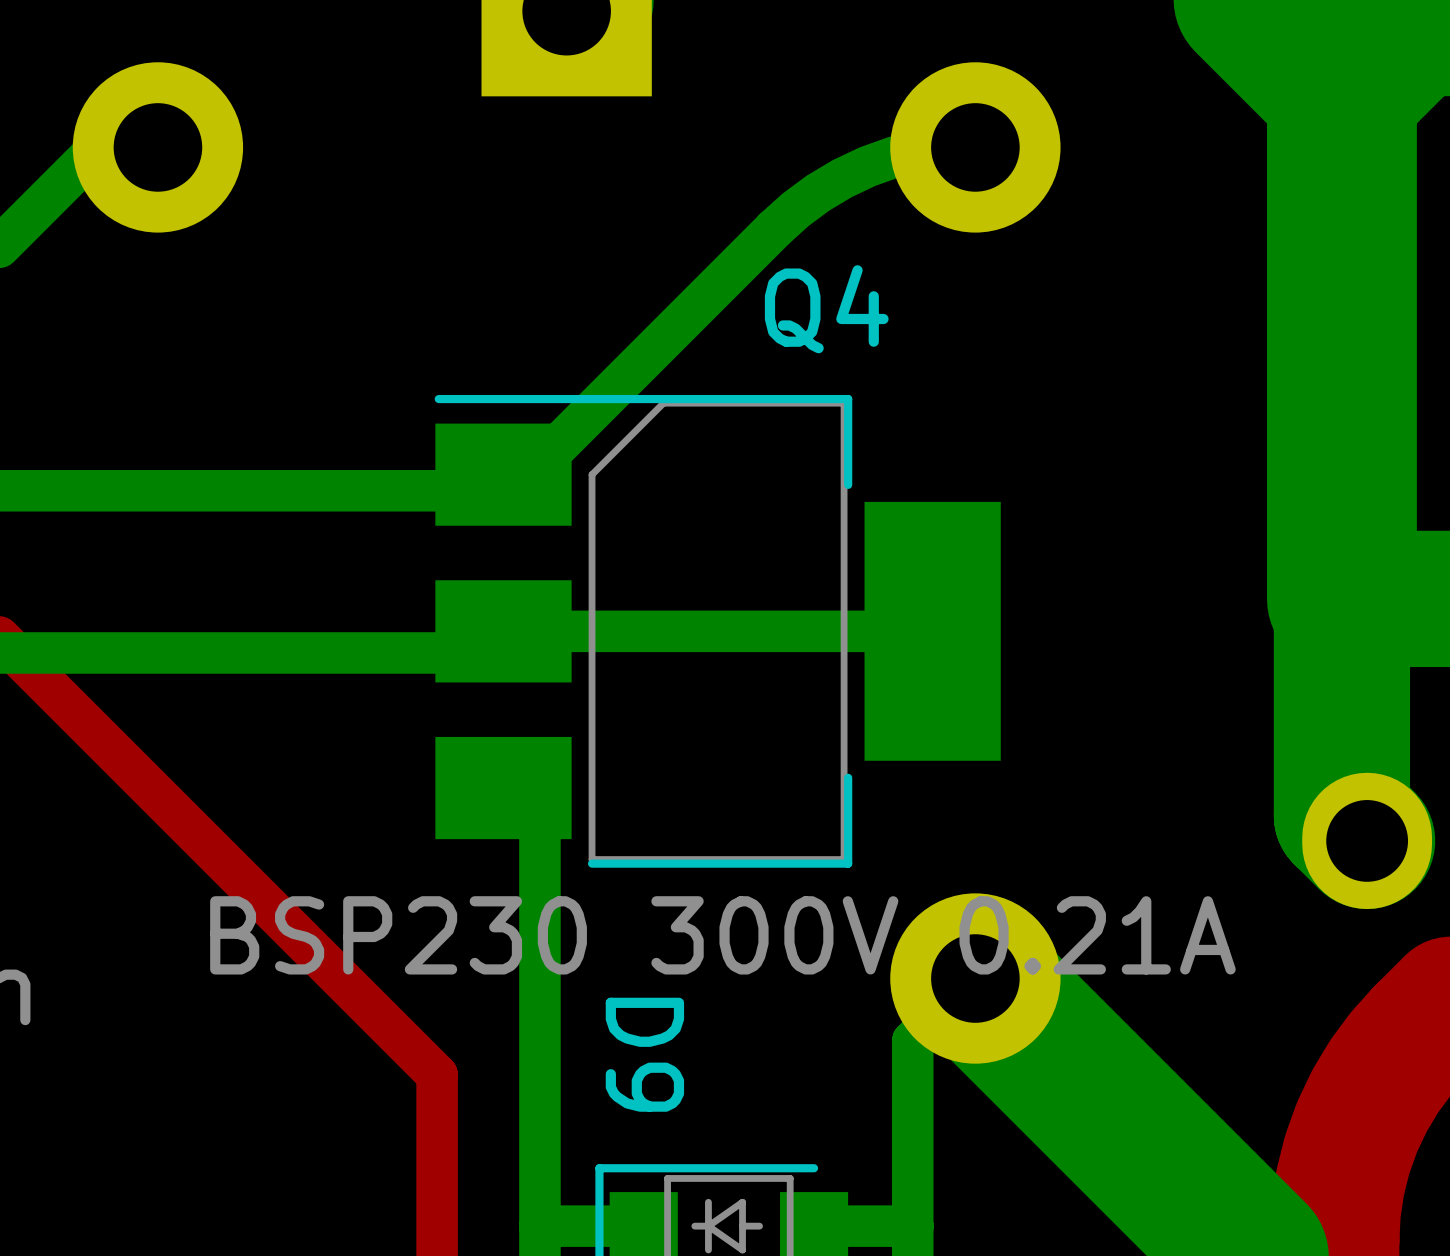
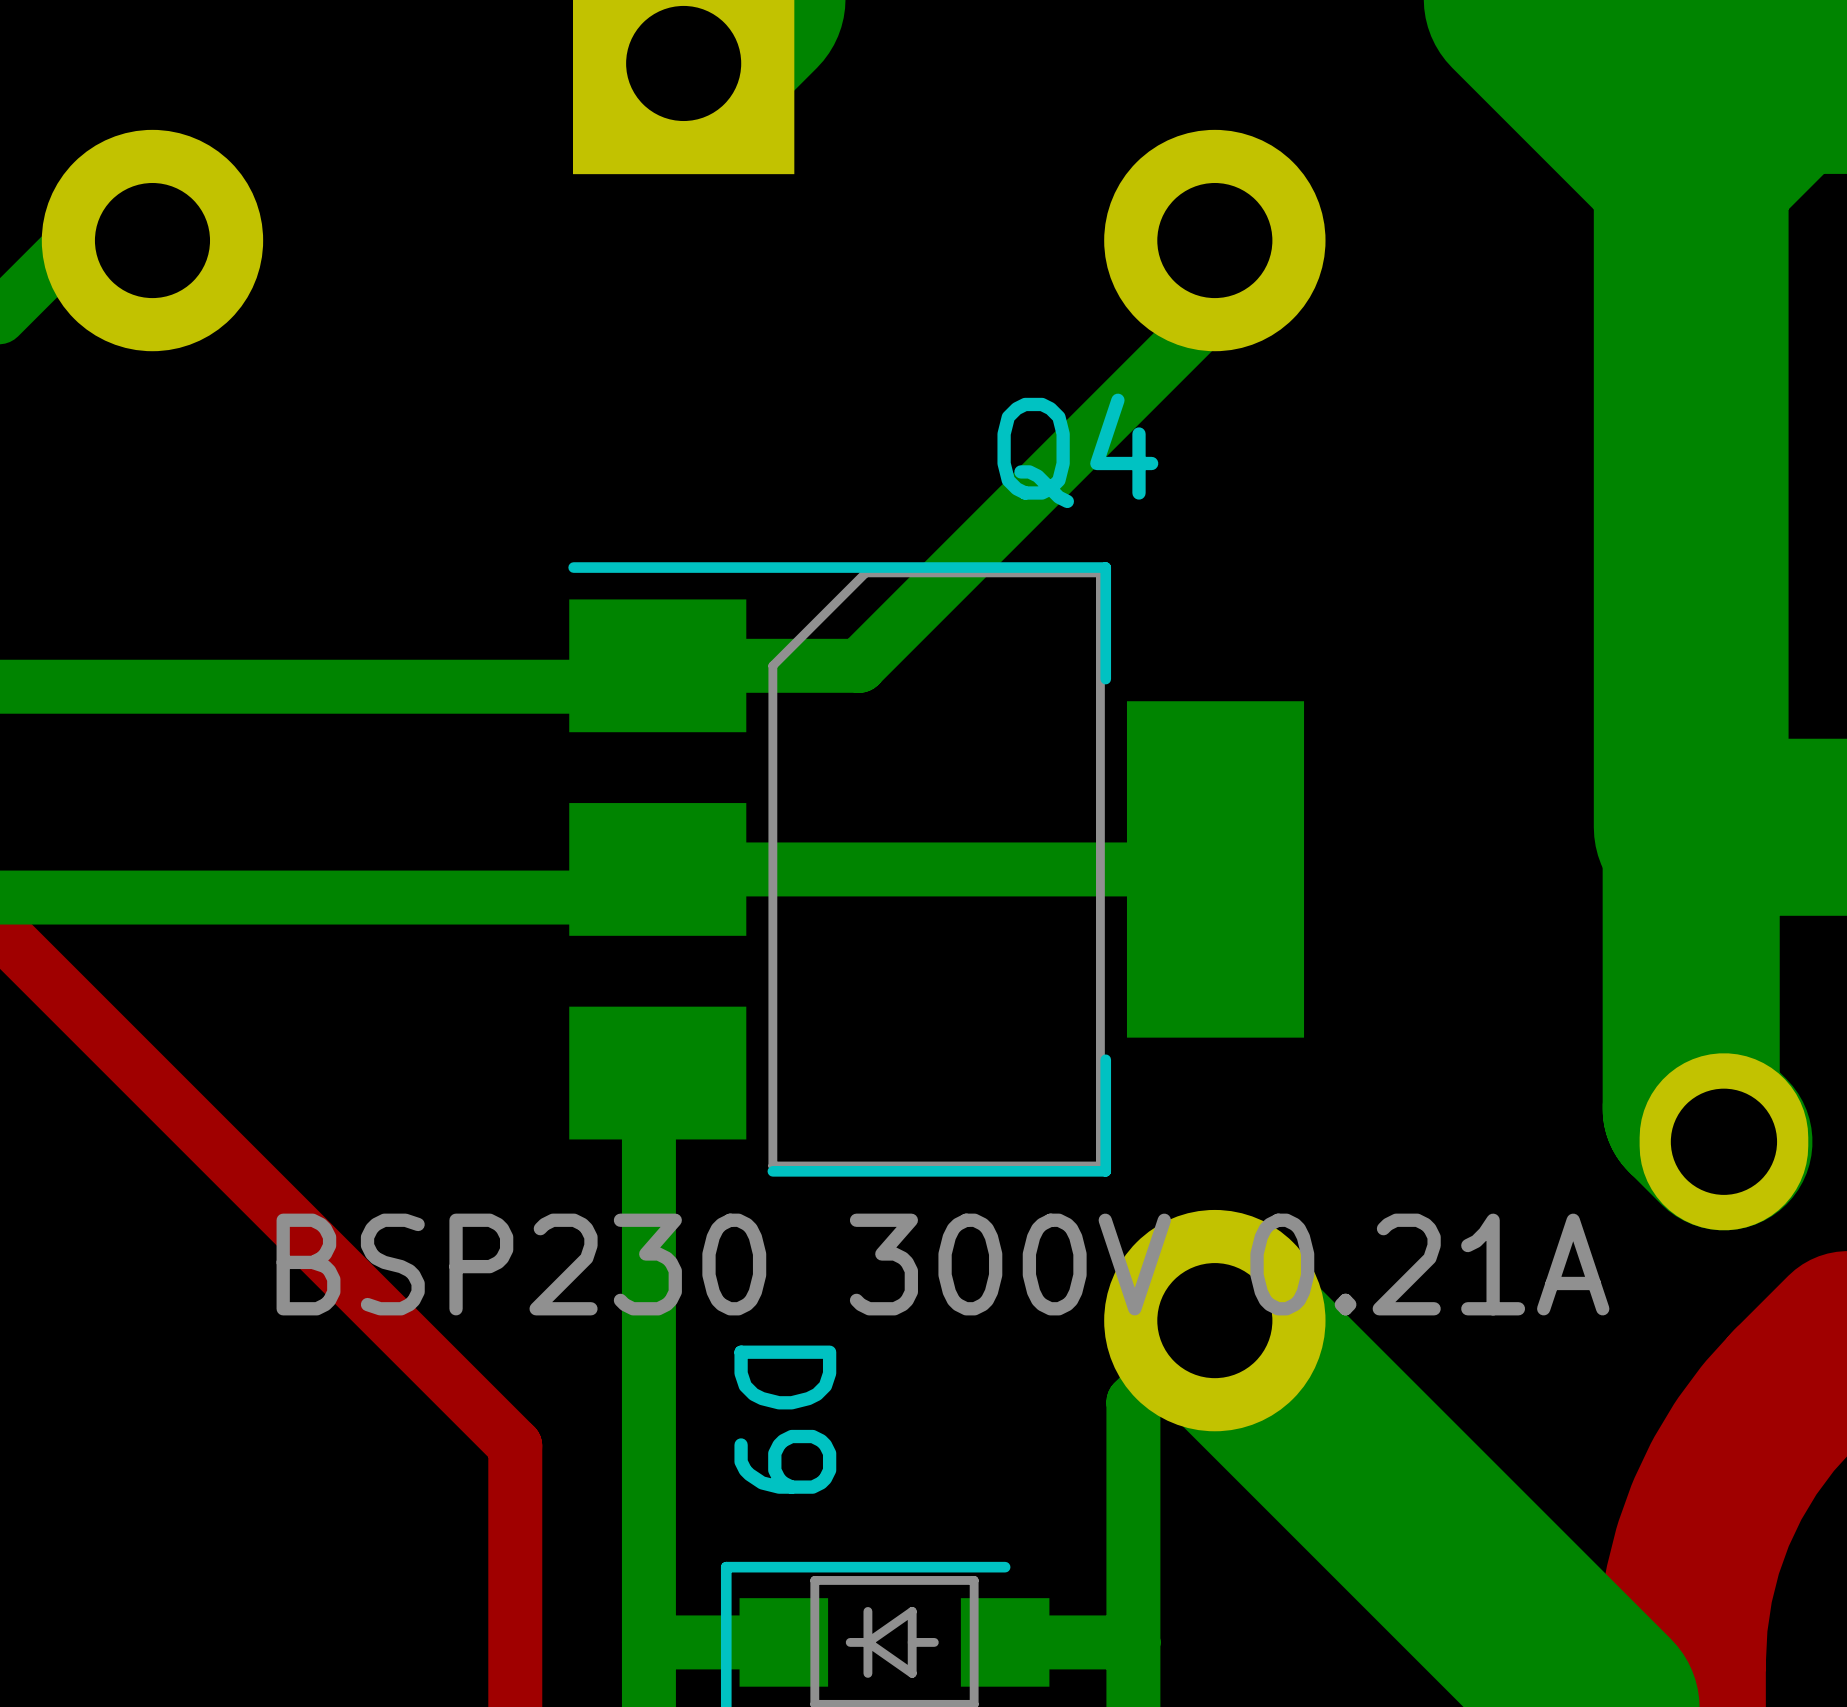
bottom track: (977, 144) (949, 146) (894, 157) (867, 166) (818, 193) (774, 228) (528, 474) (503, 474) (503, 490) -> (1217, 307) (859, 665) (657, 665) (636, 686) (601, 686)
Q4 position: (717, 631) -> (936, 869)

